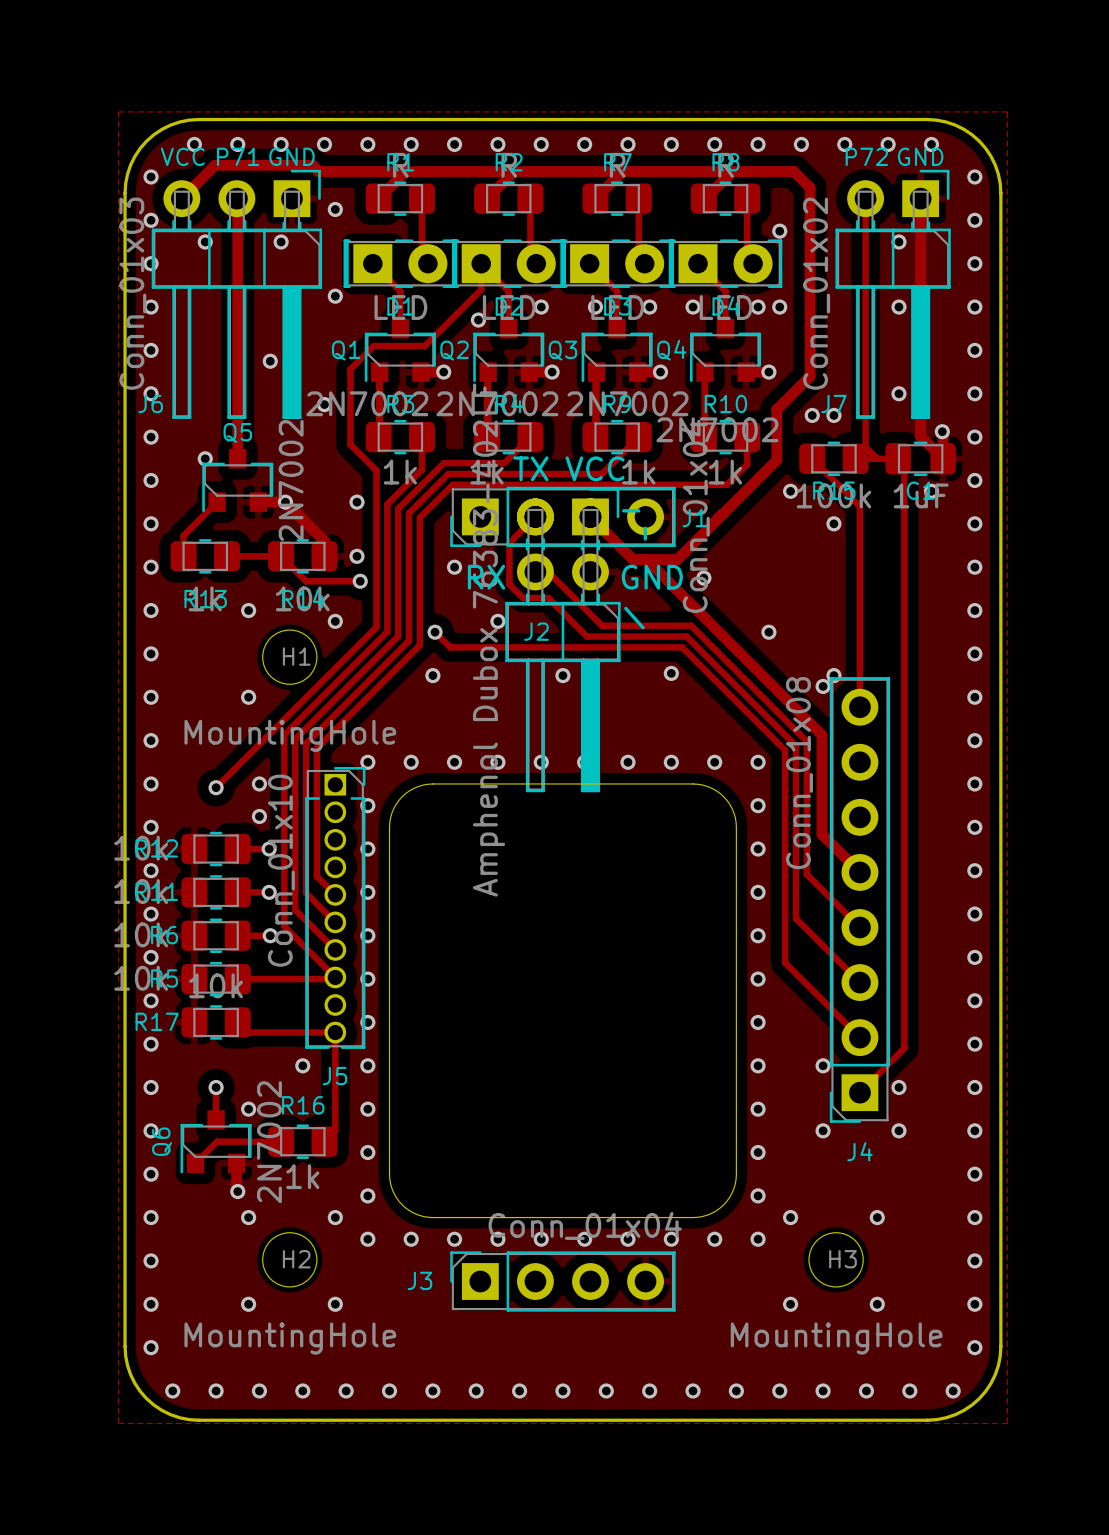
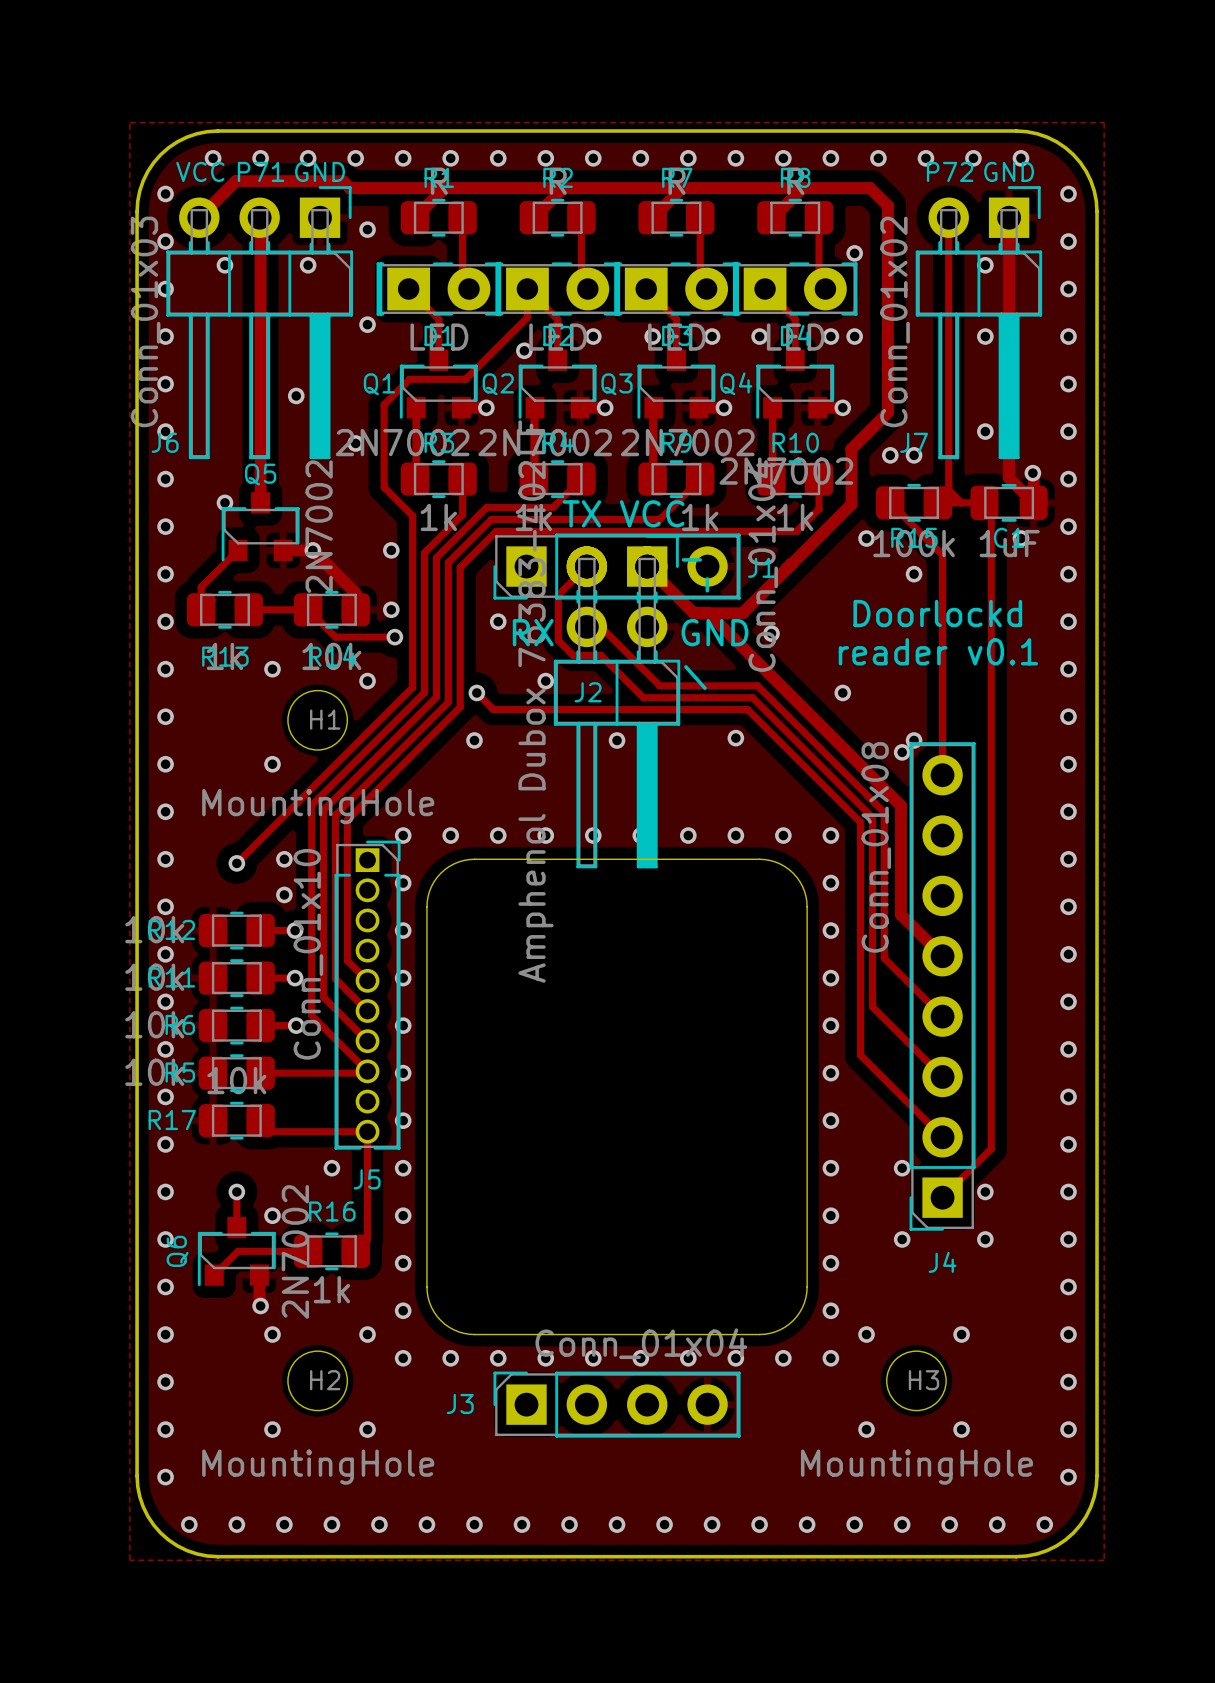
text: none -> Doorlockd (937, 613)
text: none -> reader v0.1 (938, 651)

